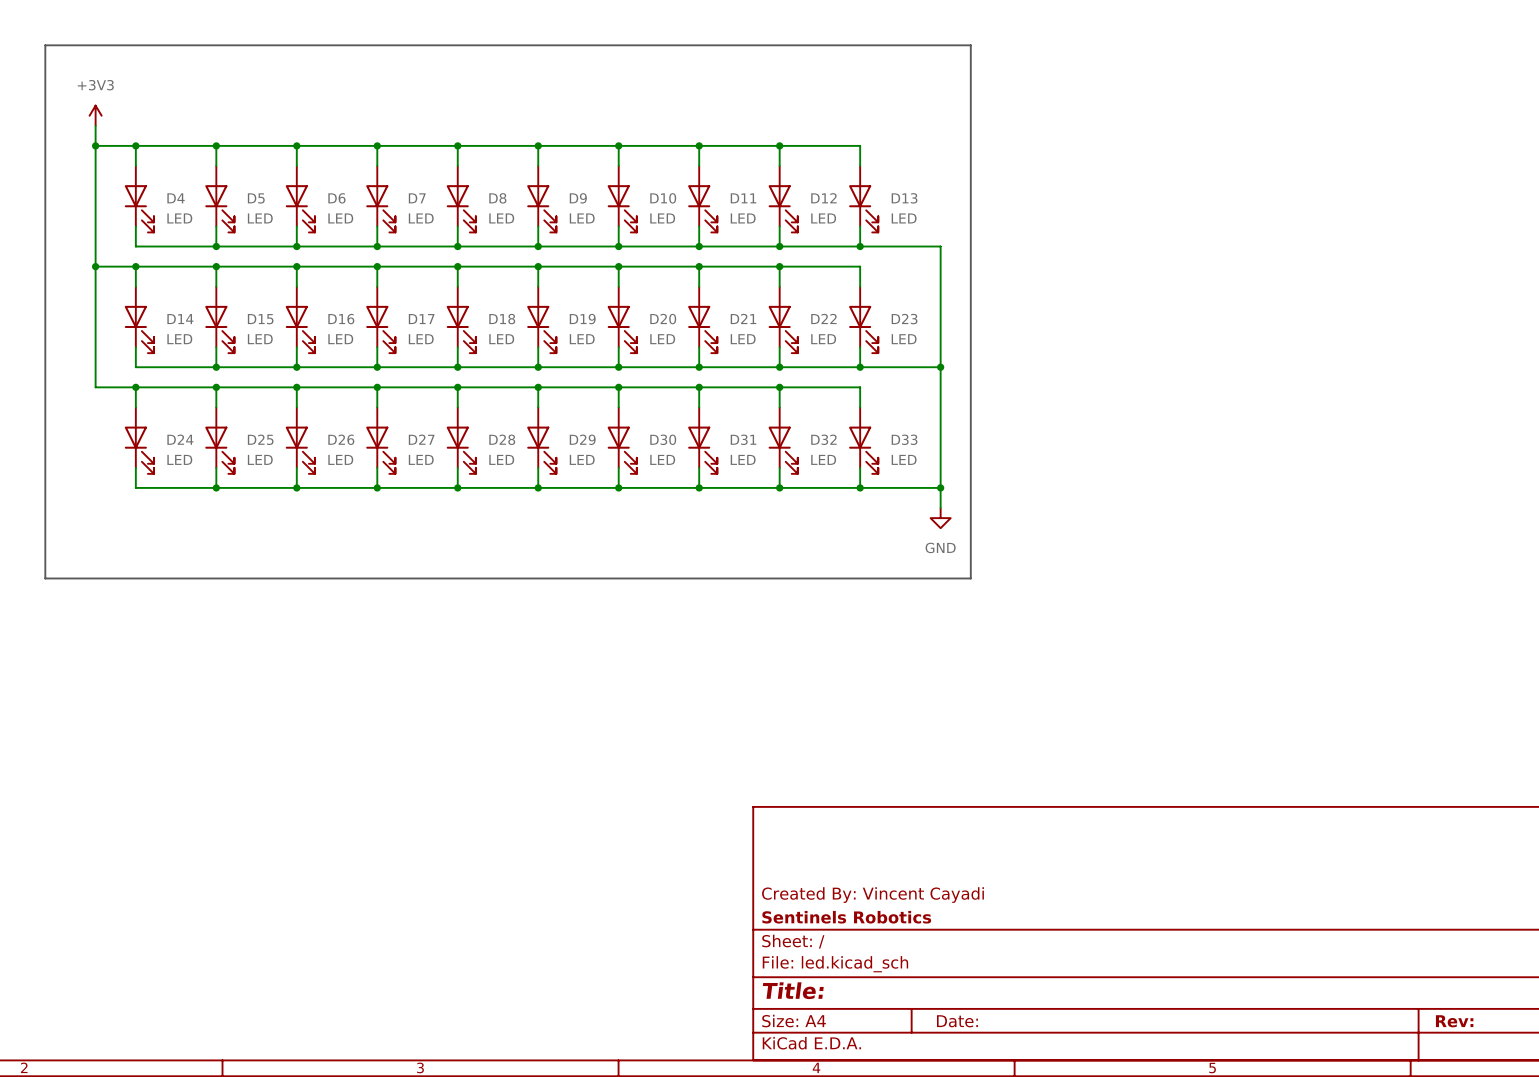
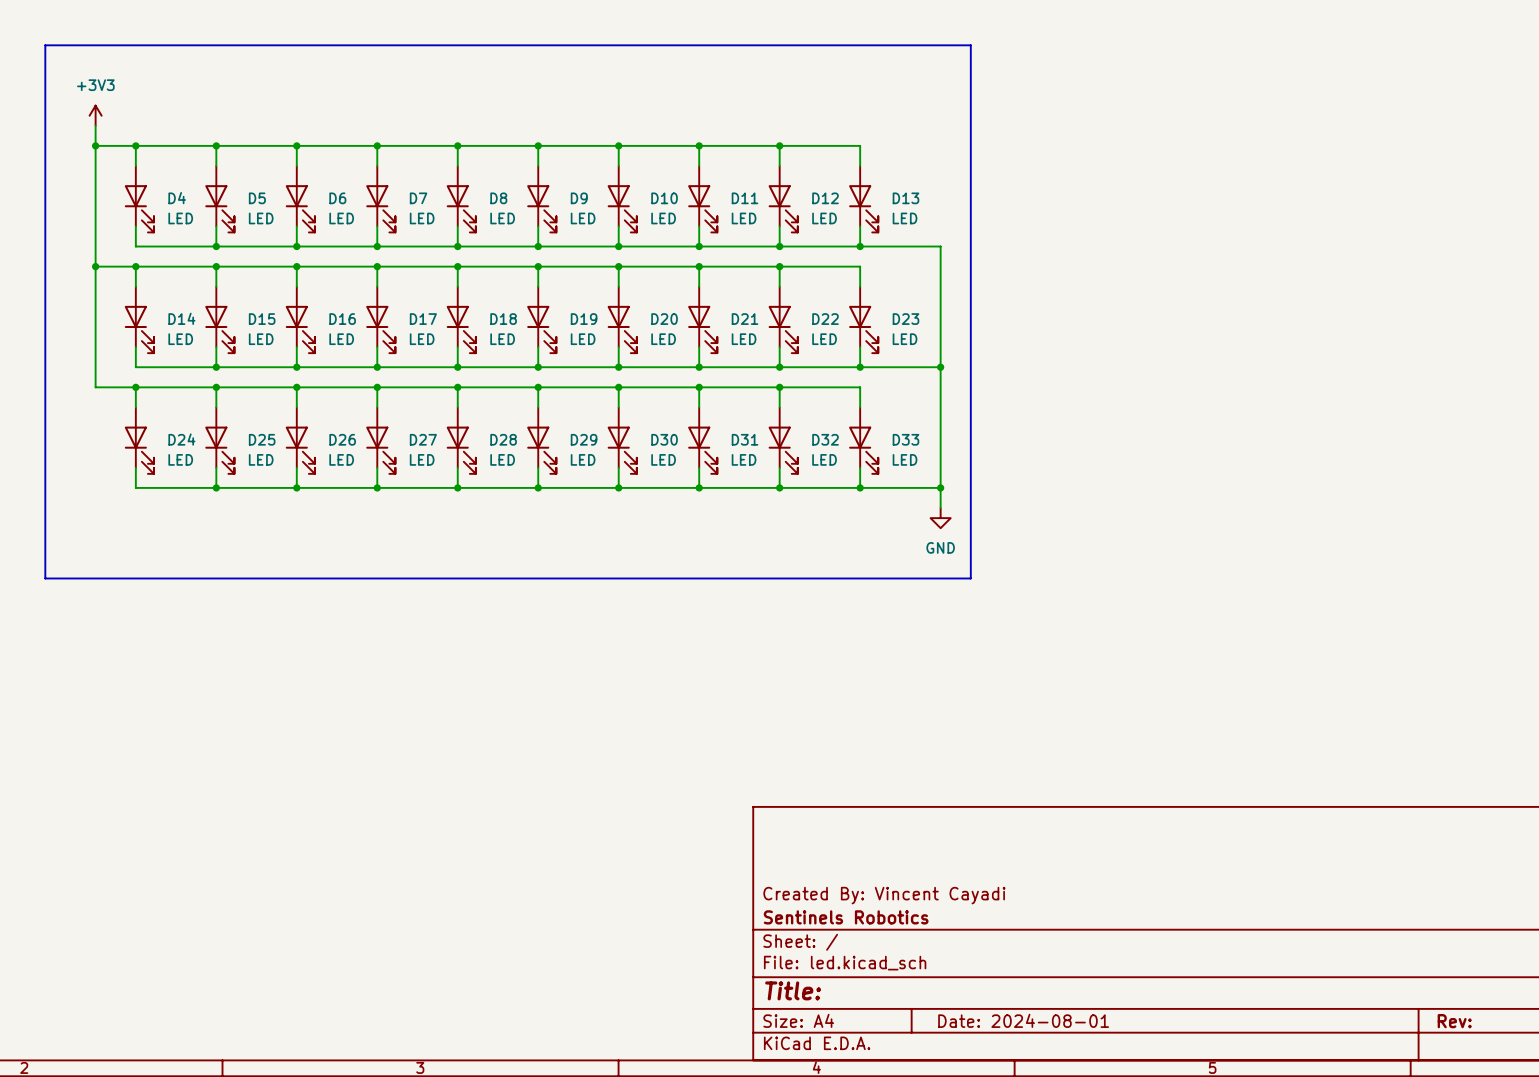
title block: Date: (957, 1021) -> Date: 2024-08-01 (1023, 1020)

